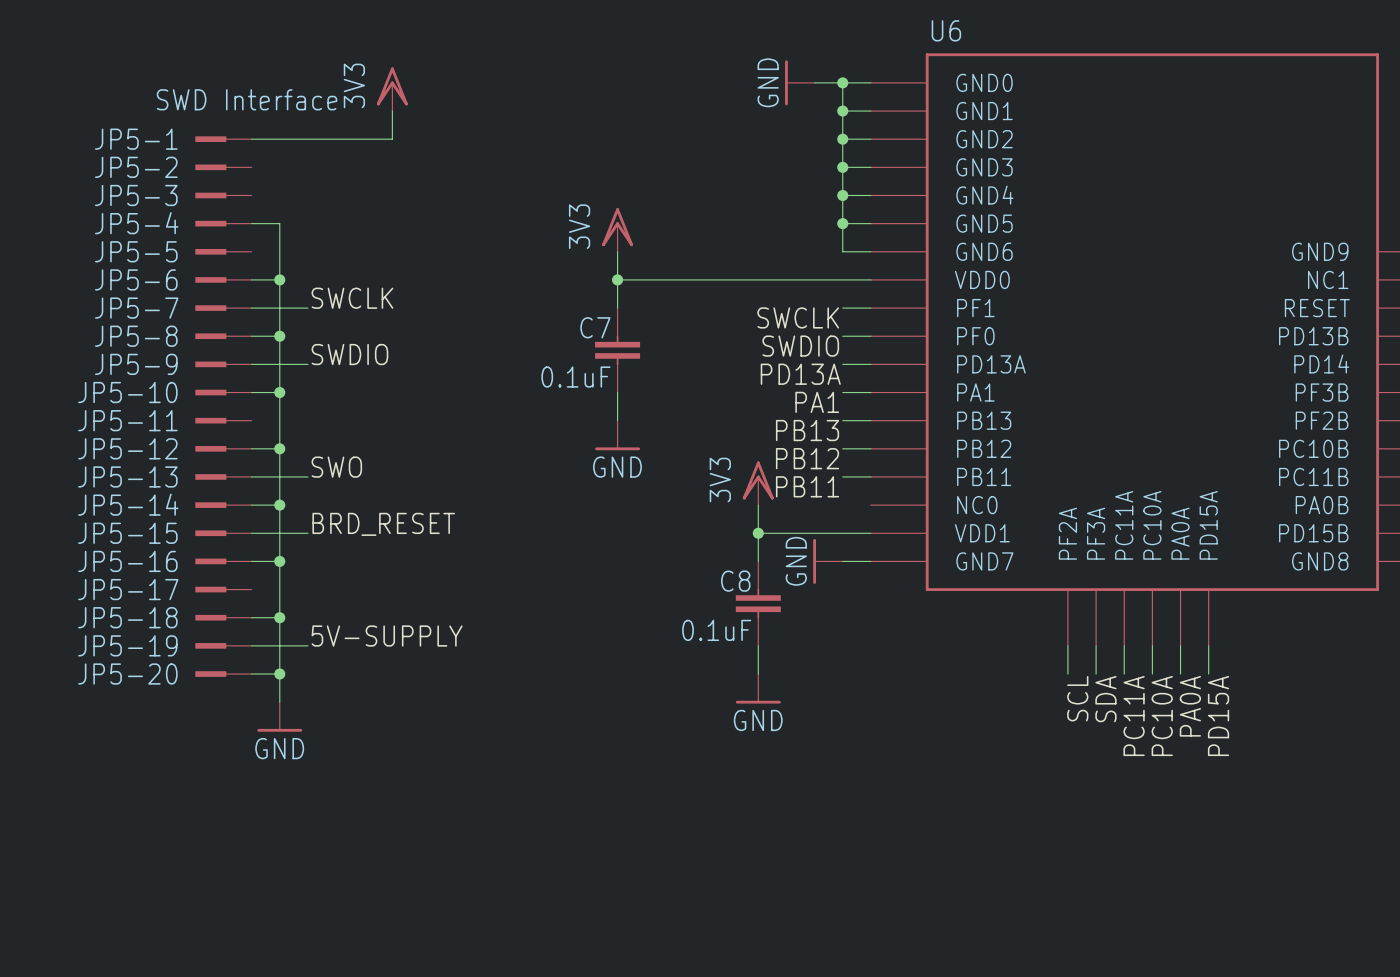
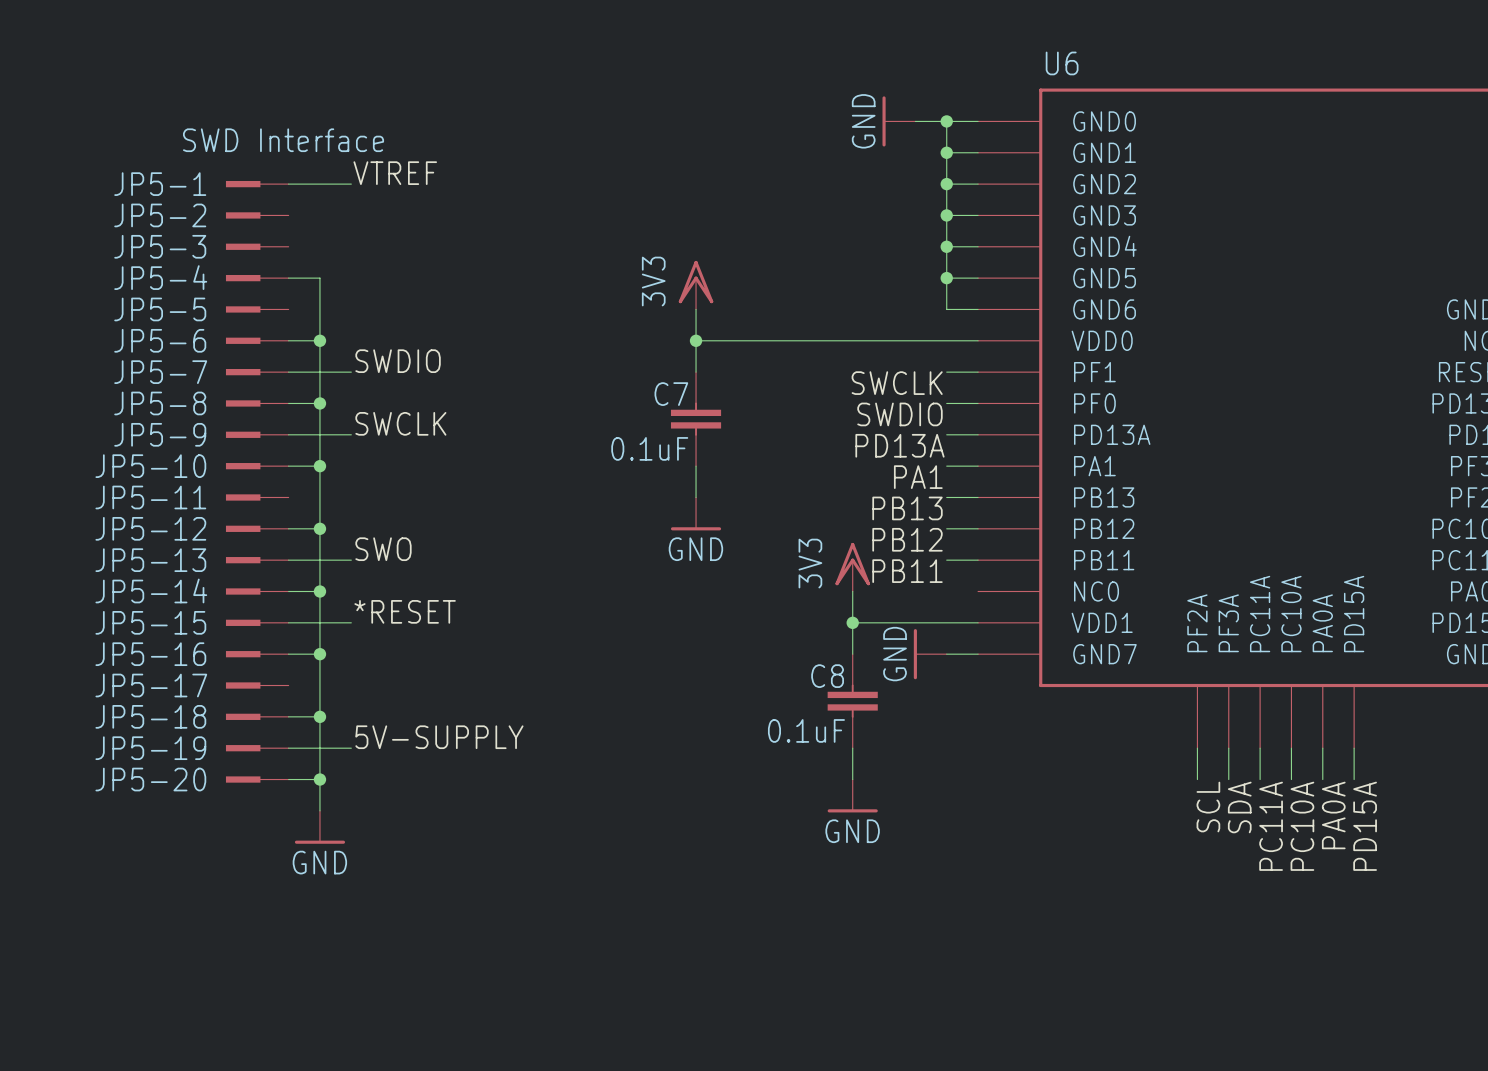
power symbol: 3V3 (392, 89) -> none
wire: (392, 111) (392, 139) (307, 139) -> none
label: none -> VTREF (395, 173)
label: SWCLK (352, 298) -> SWDIO (398, 361)
label: SWDIO (349, 354) -> SWCLK (400, 423)
label: BRD_RESET (383, 524) -> *RESET (405, 611)

